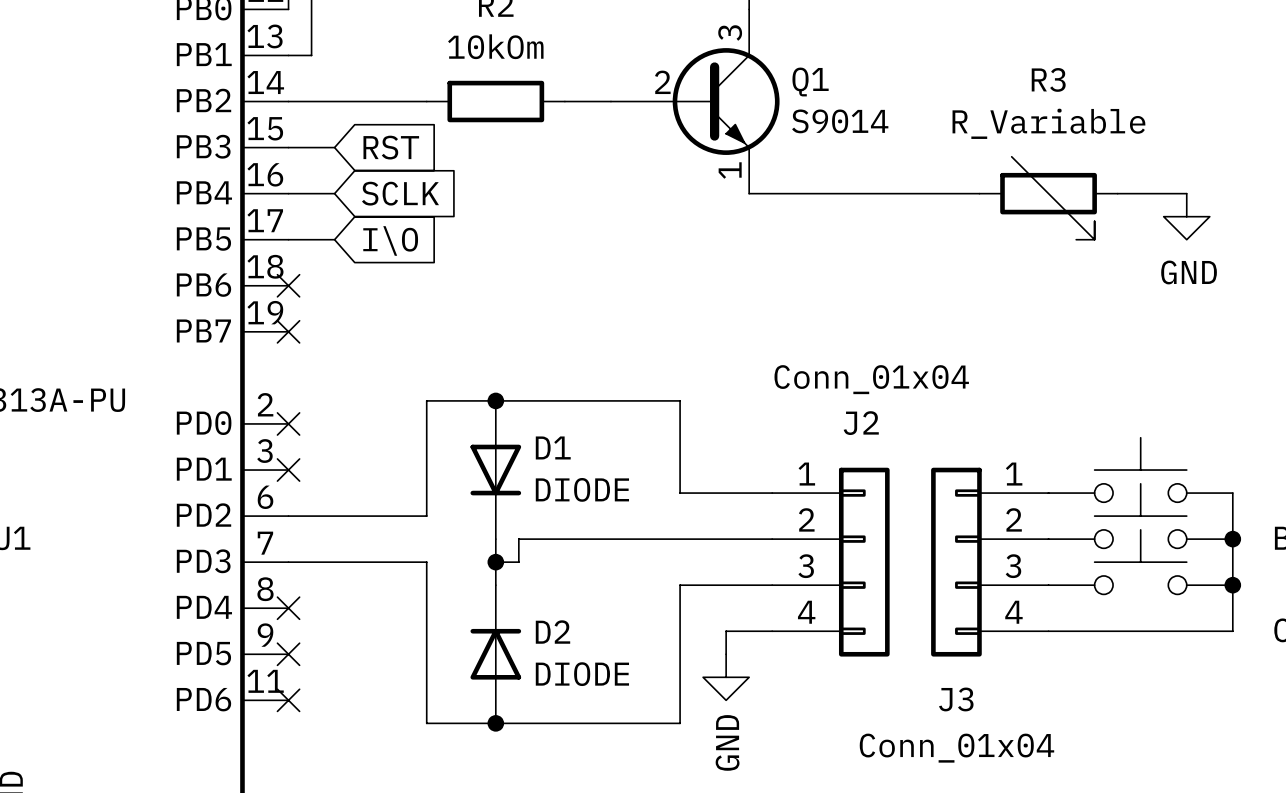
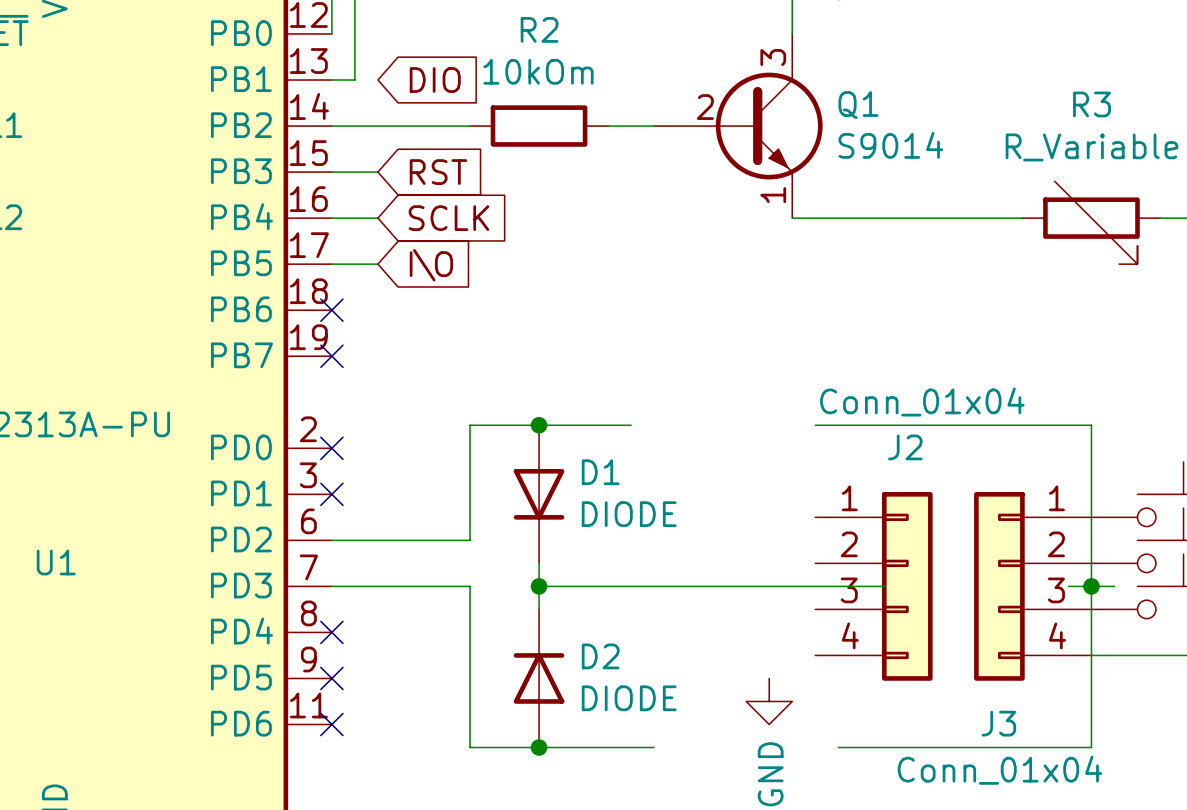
global label: none -> DIO (435, 80)
wire: (587, 400) (680, 400) (680, 493) (772, 493) -> none
wire: none -> (815, 425) (1091, 425) (1091, 747) (838, 747)
wire: (772, 539) (518, 539) (518, 562) -> (884, 586) (562, 586)
wire: none -> (1068, 586) (1114, 586)
junction: none -> (1091, 586)
wire: (772, 585) (680, 585) (680, 723) (610, 723) -> none
wire: (772, 631) (726, 631) (726, 654) -> none

